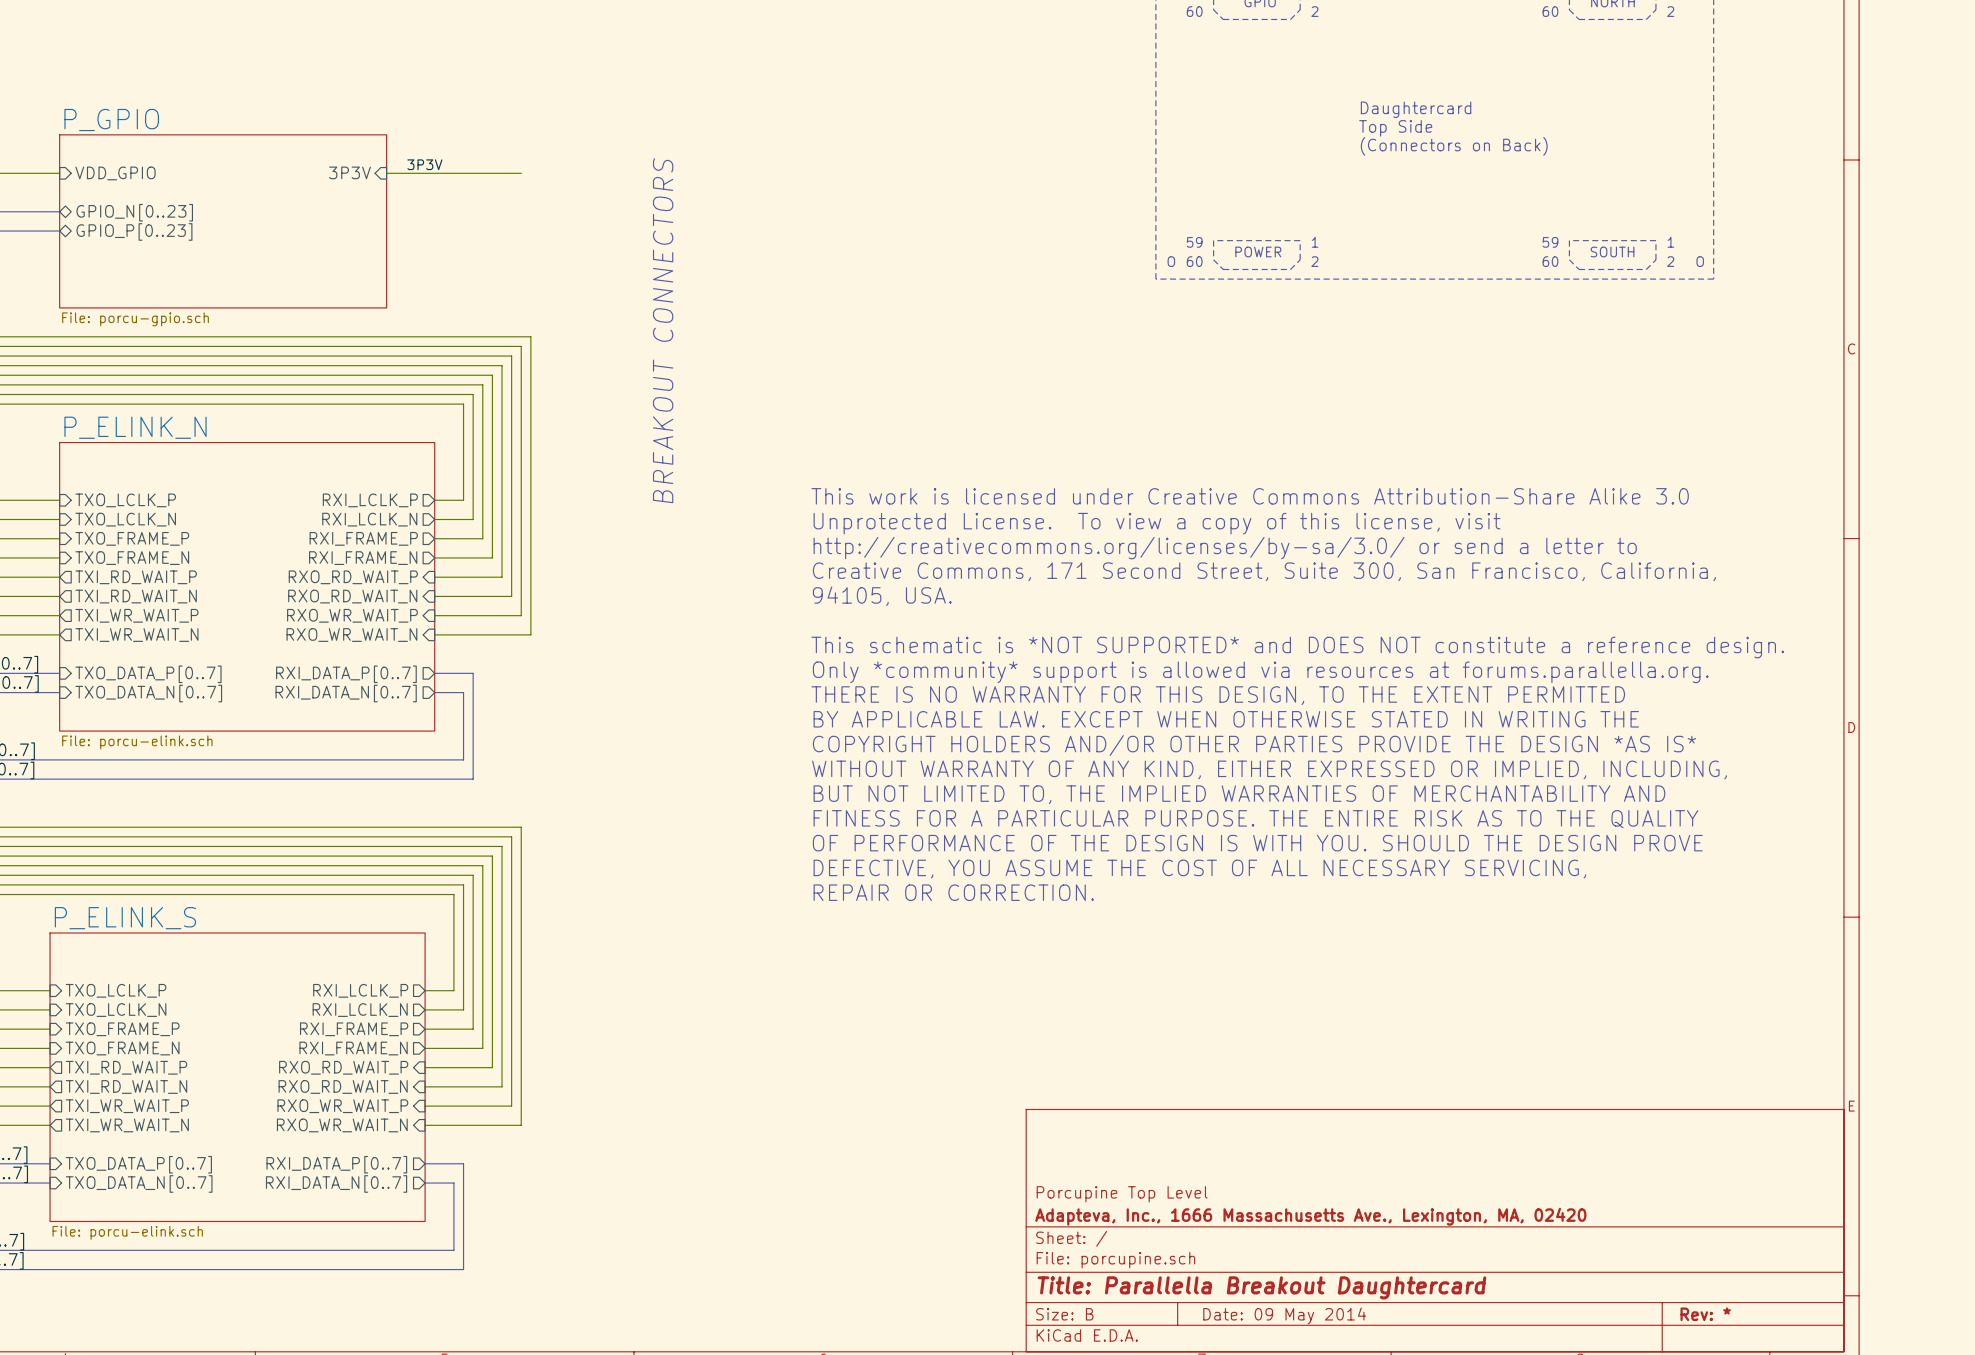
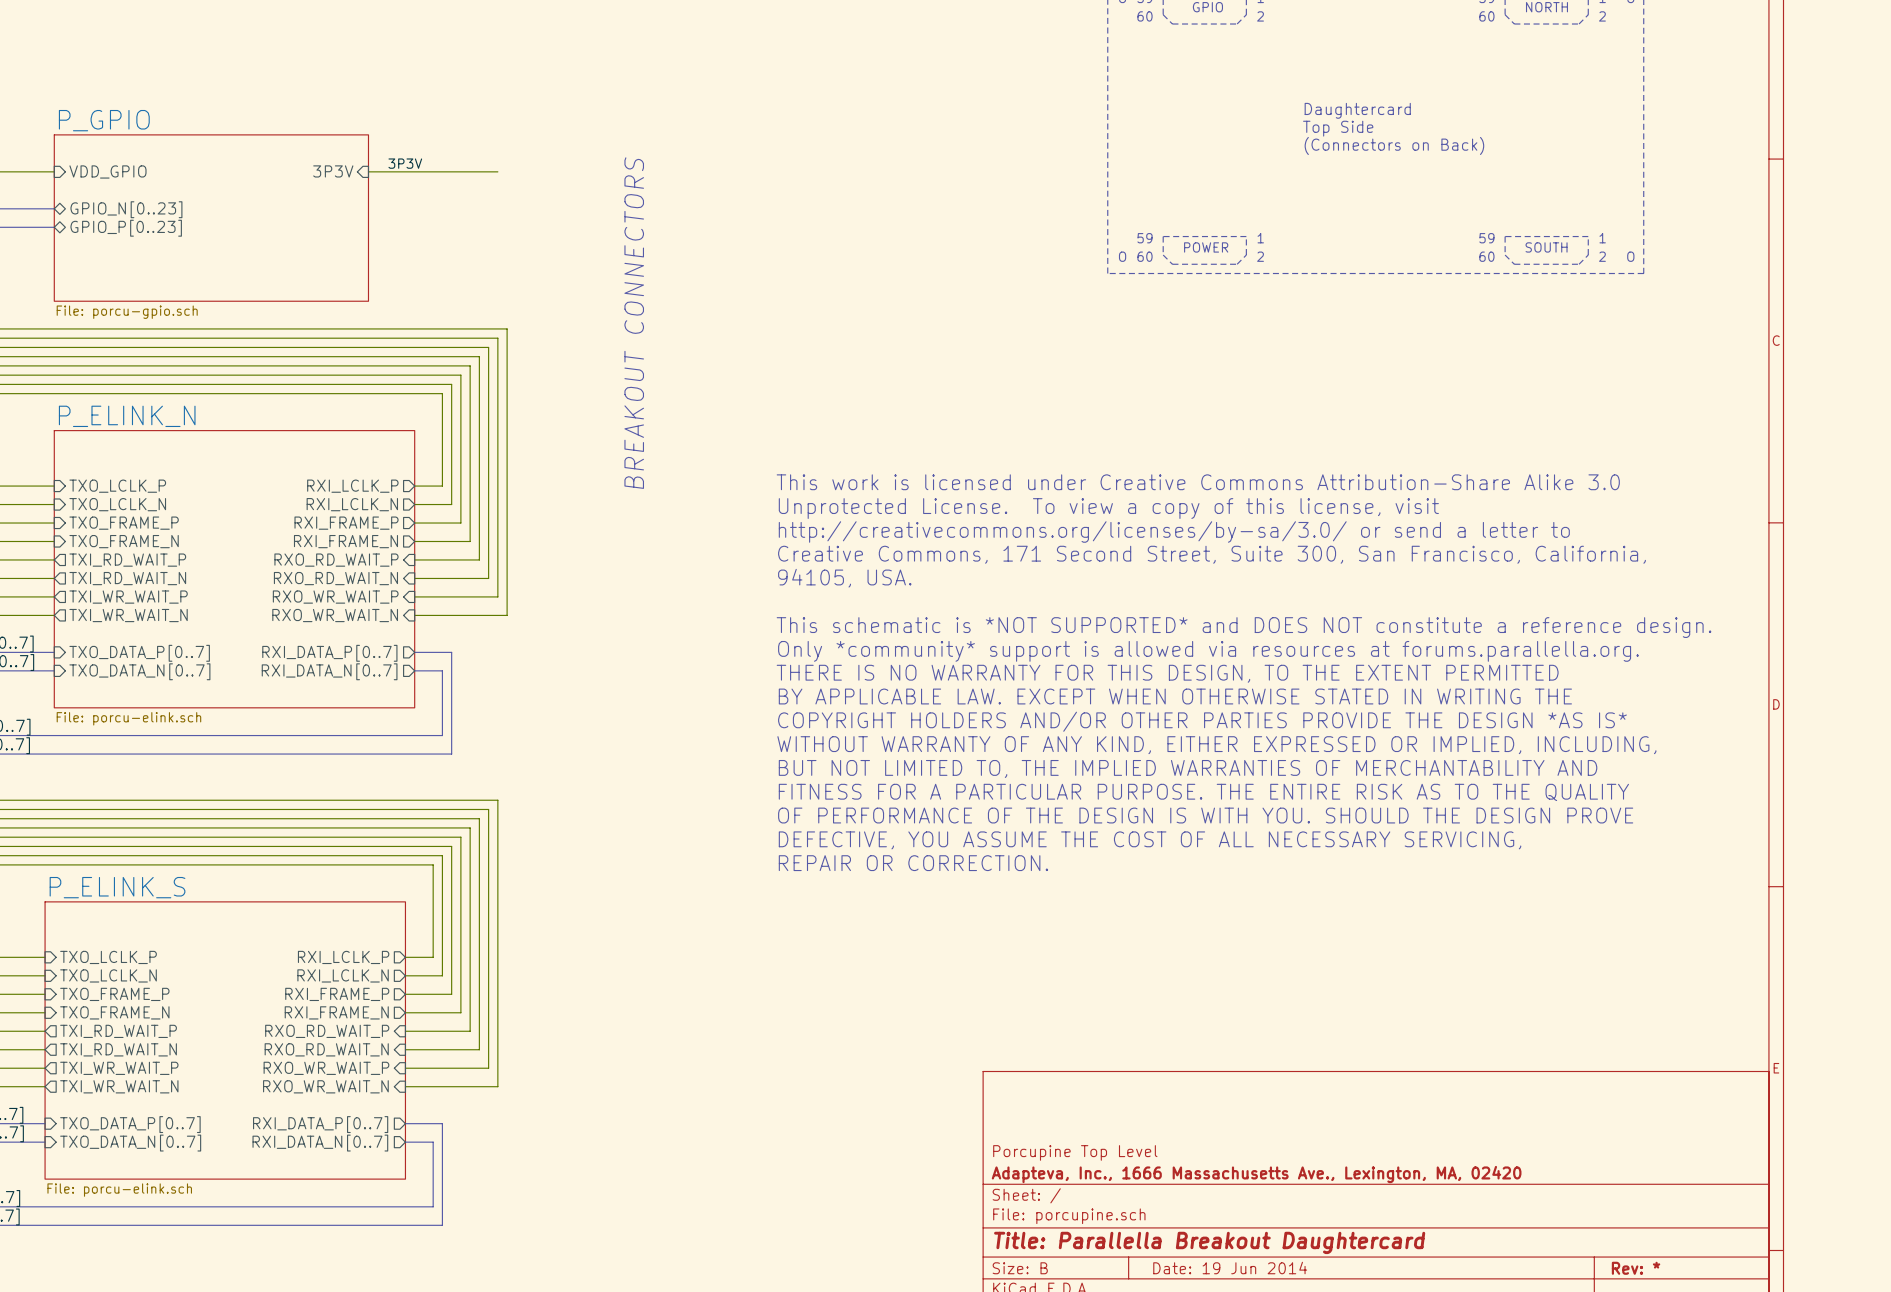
title block: Date: 09 May 2014 (1284, 1315) -> Date: 19 Jun 2014 (1230, 1268)

